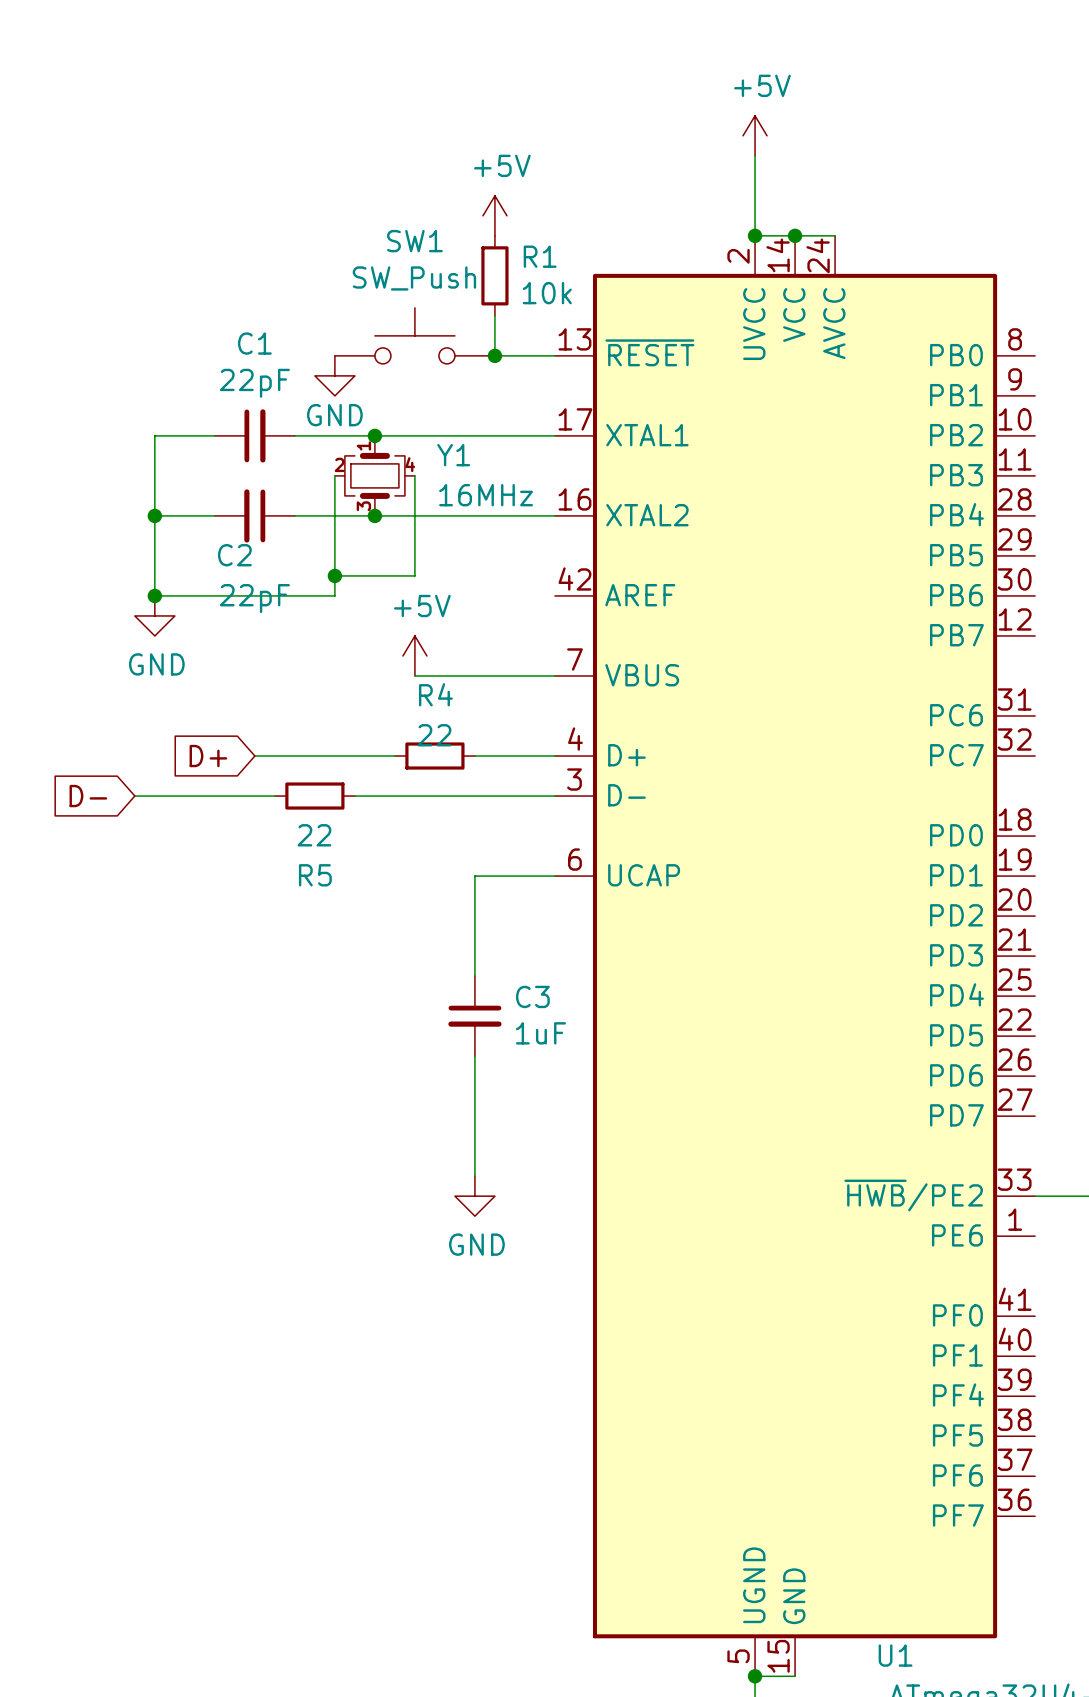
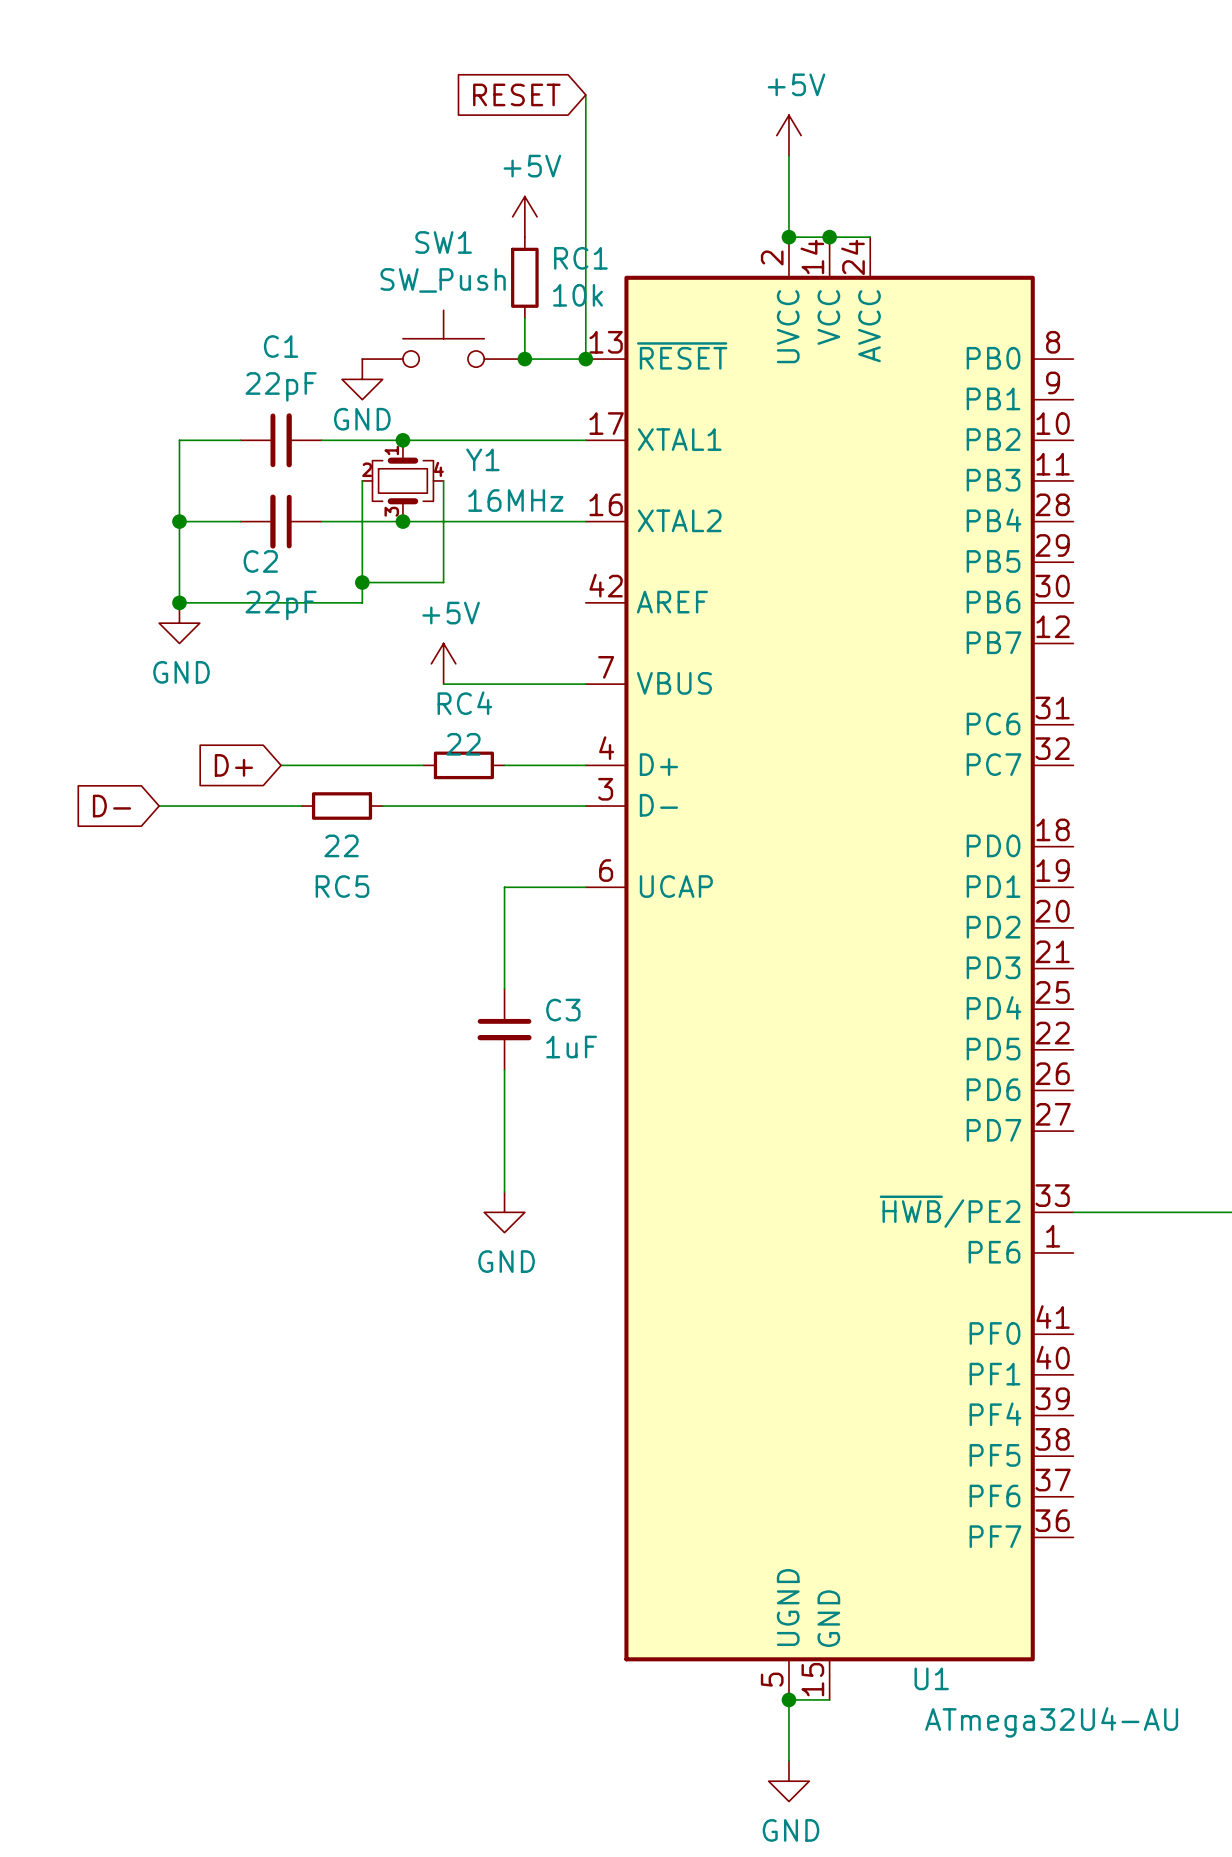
global label: none -> RESET (516, 94)
wire: none -> (585, 94) (585, 359)
R1 name: R1 (540, 256) -> RC1 (580, 258)
junction: none -> (585, 359)
R4 name: R4 (435, 694) -> RC4 (464, 703)
R5 name: R5 (315, 875) -> RC5 (342, 886)

